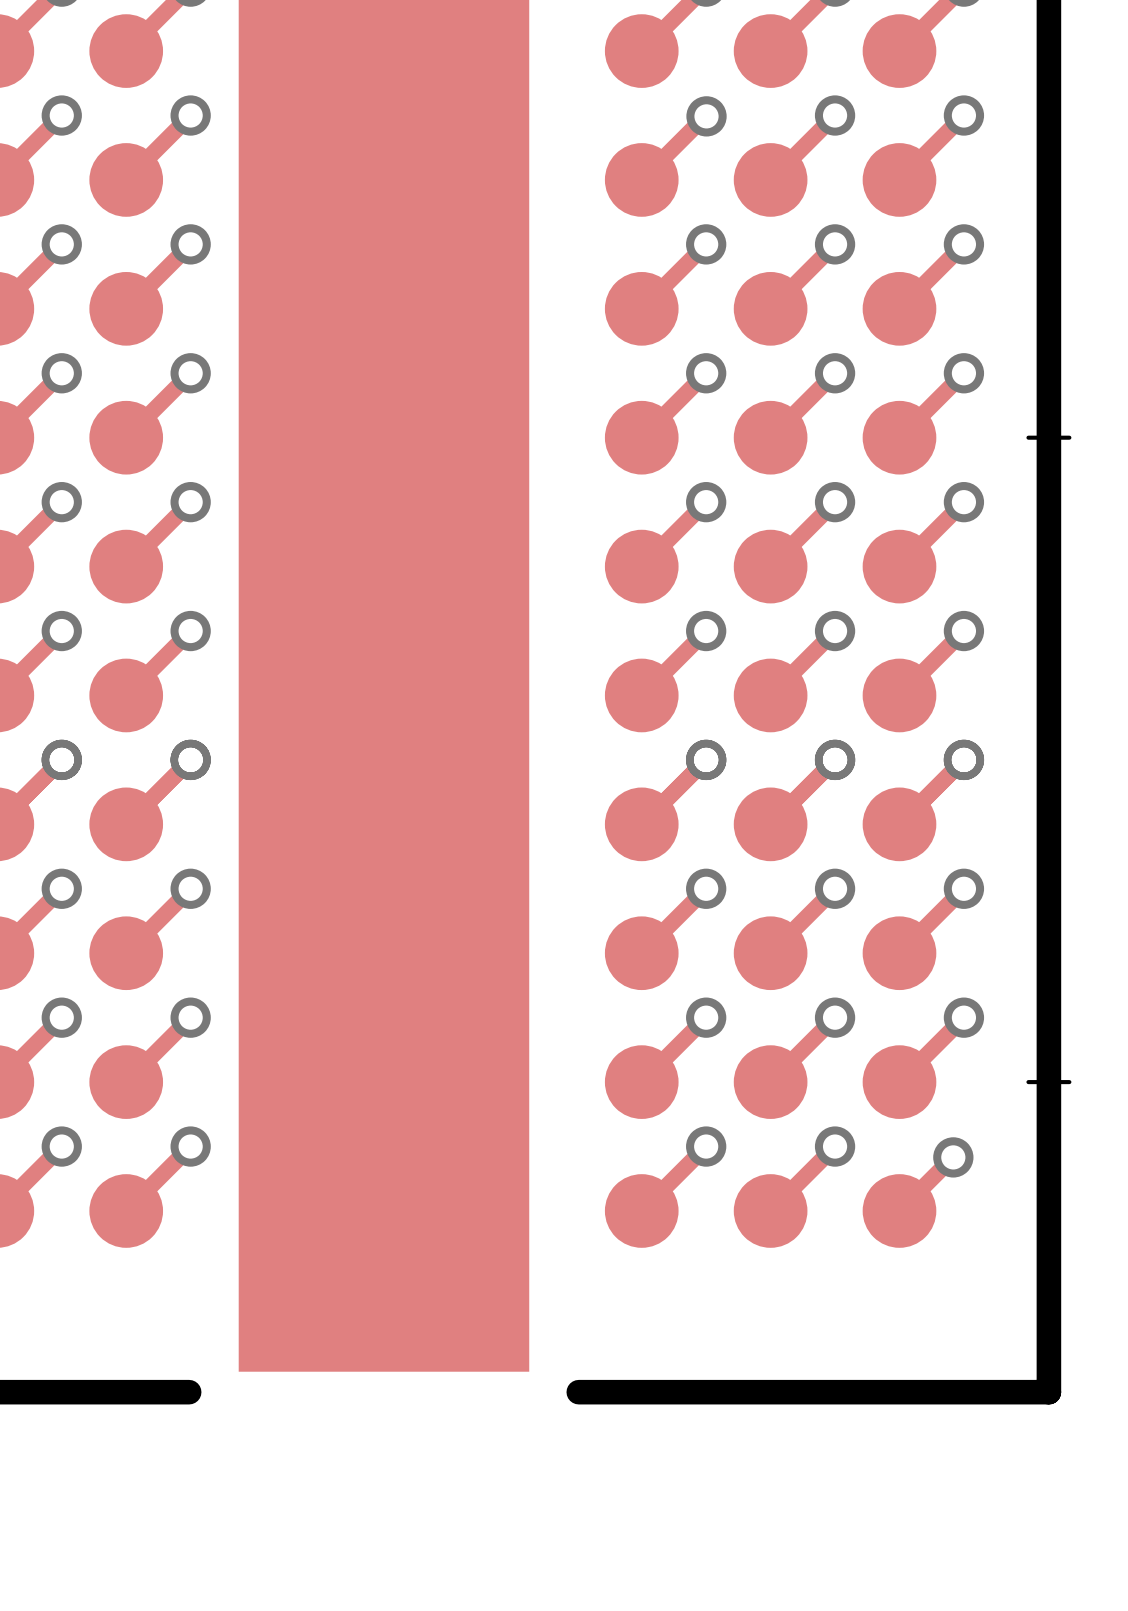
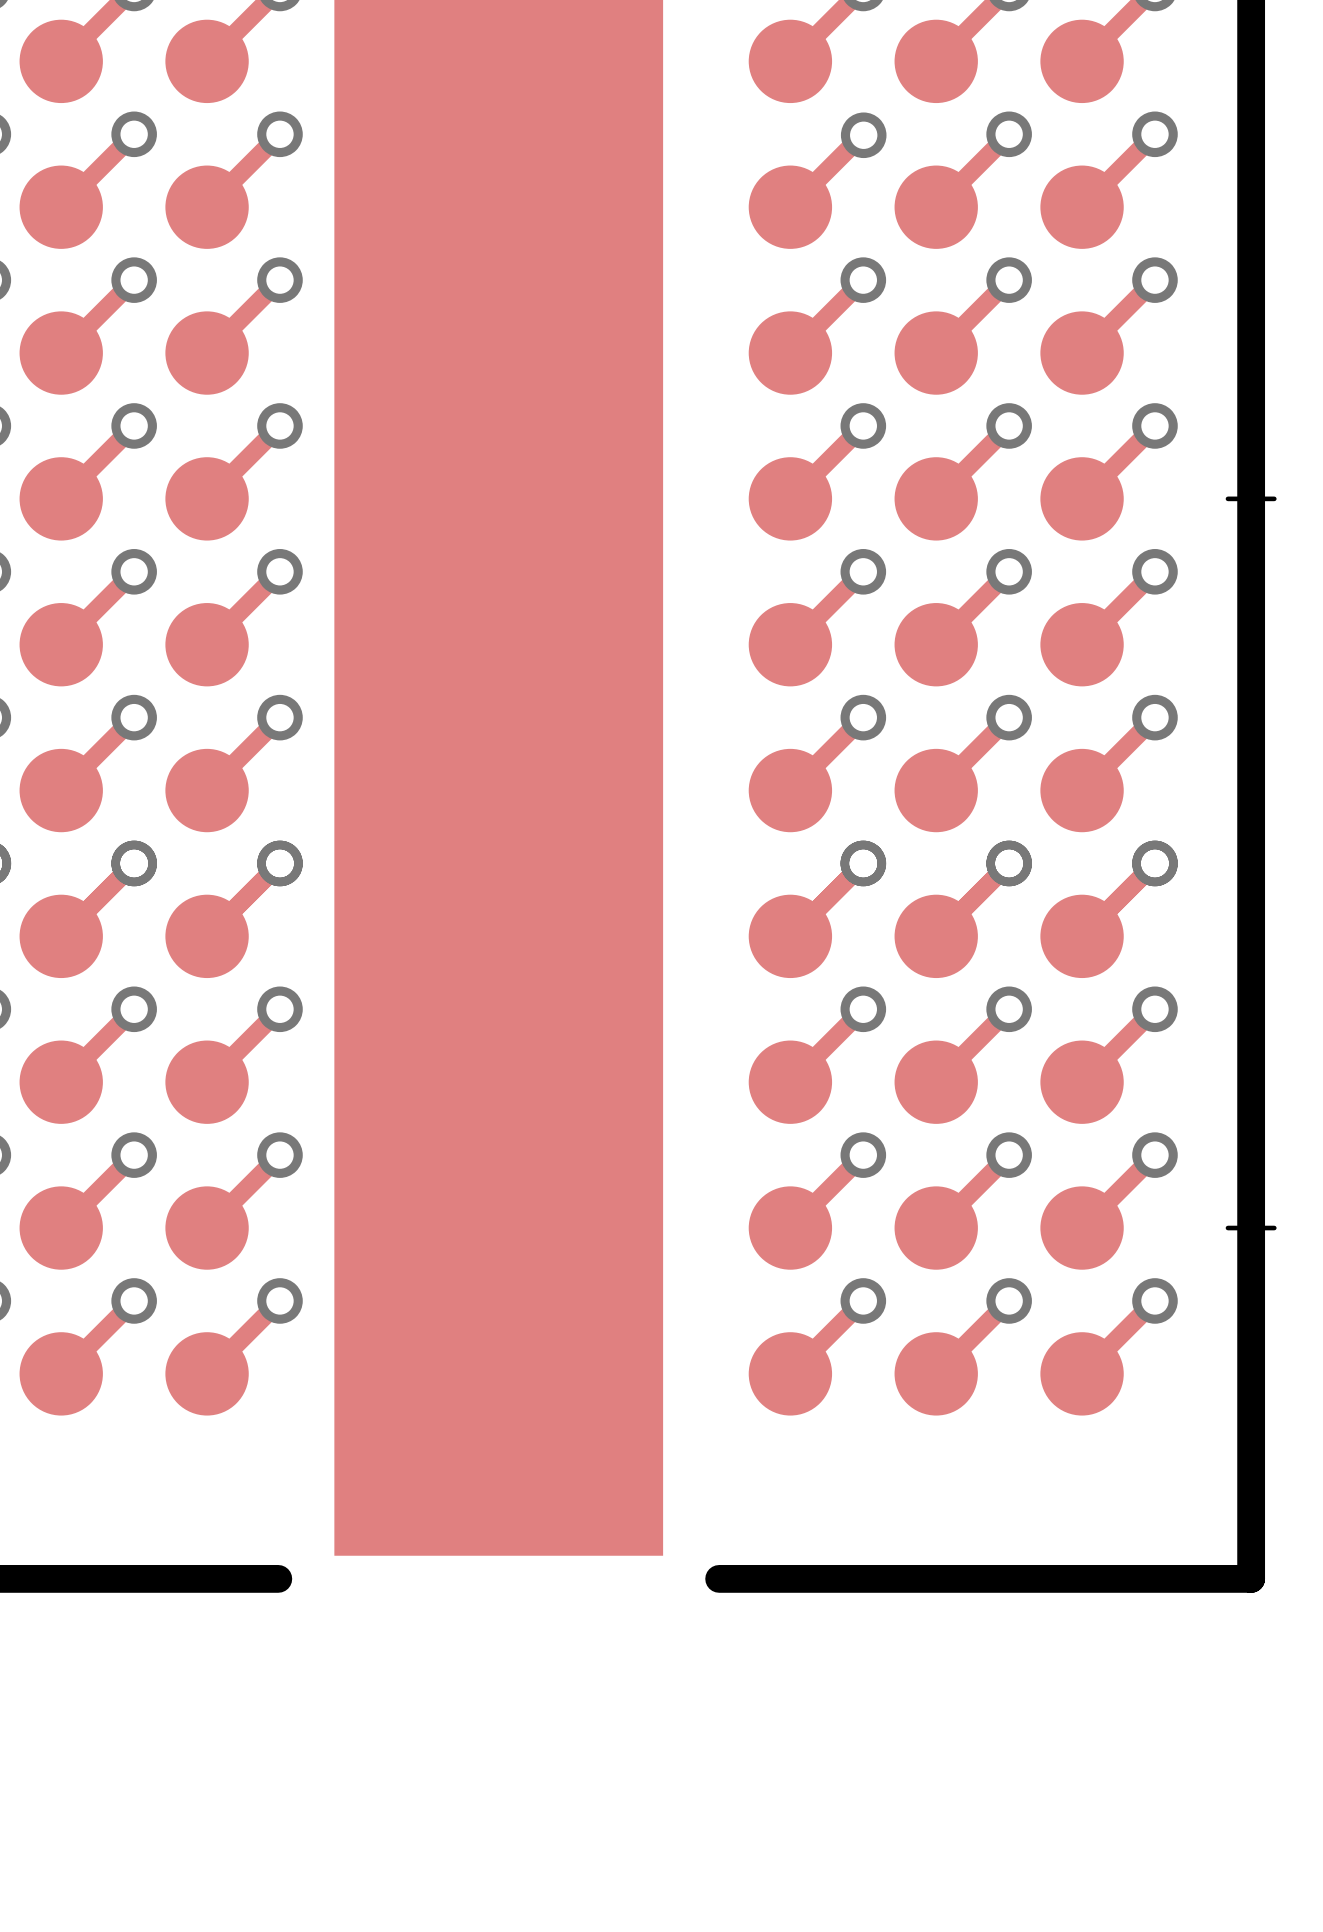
via position: (953, 1157) -> (1154, 1300)

